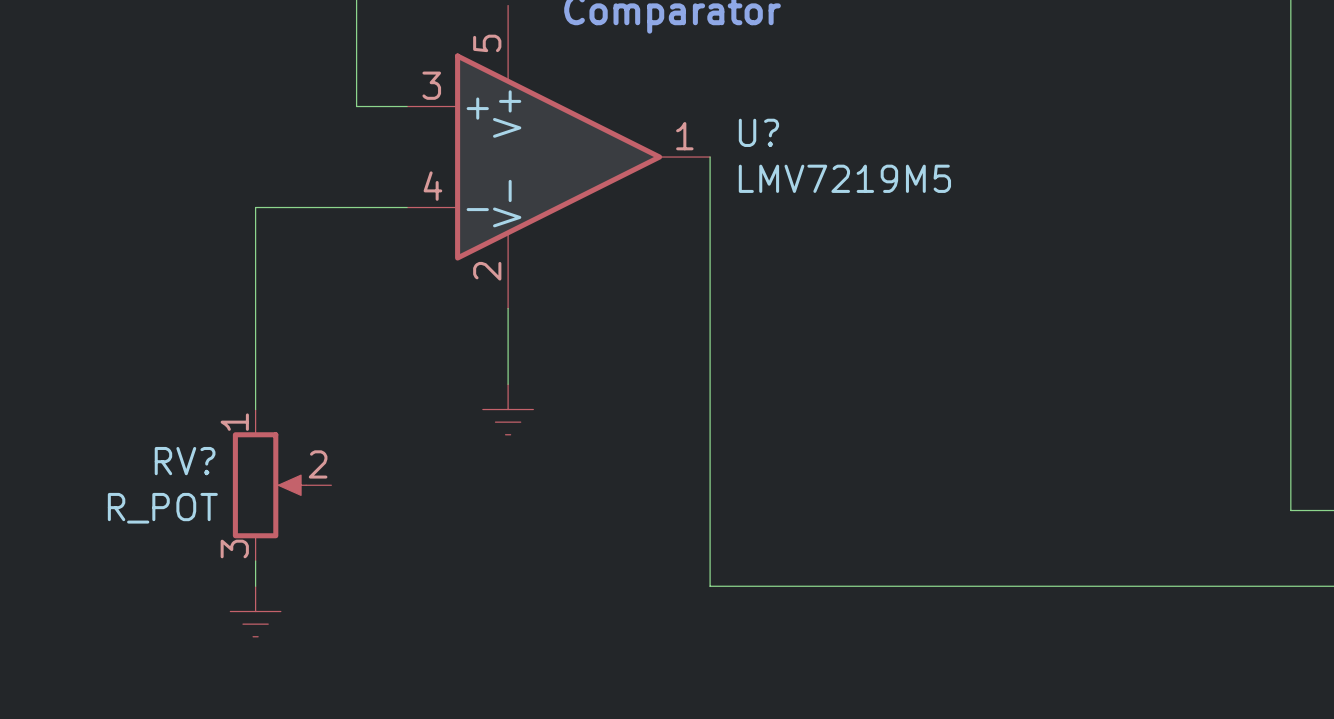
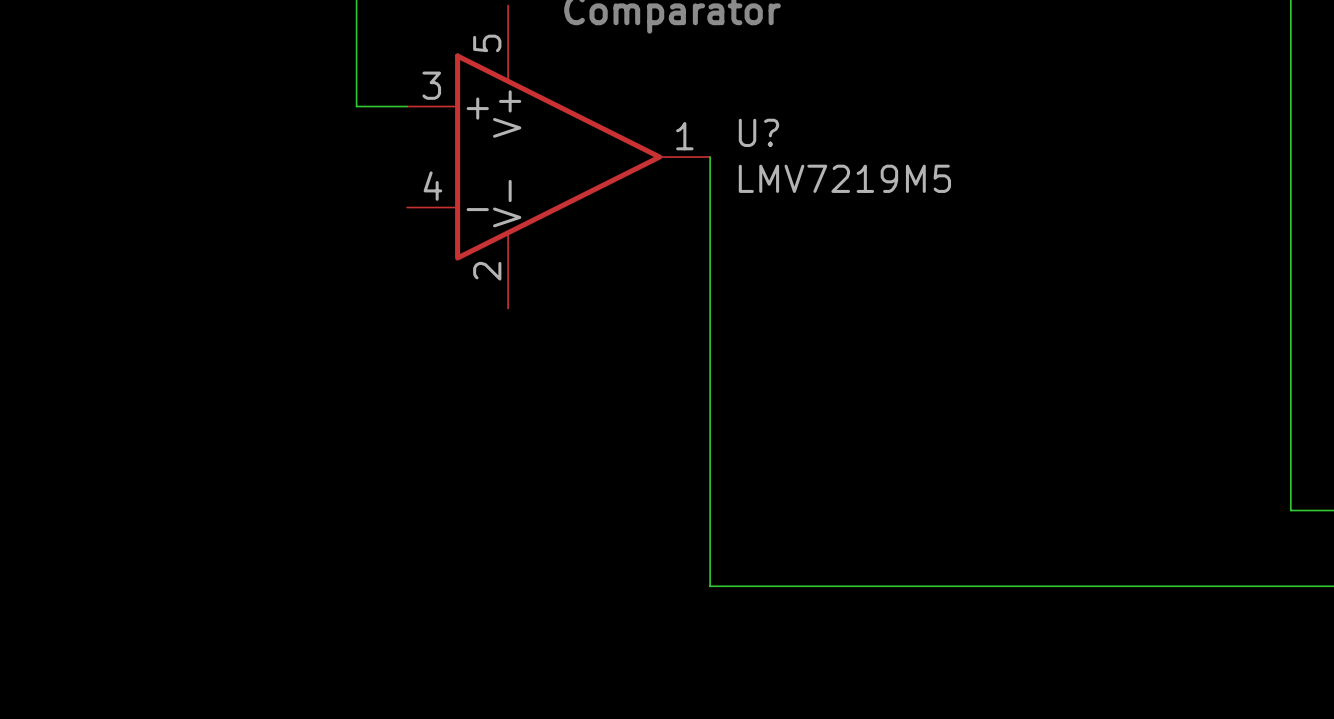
wire: (407, 207) (255, 207) (255, 409) -> none
wire: (508, 308) (508, 384) -> none
power symbol: (508, 409) -> none
RV?: R_POT (282, 485) -> none
wire: (255, 561) (255, 586) -> none
power symbol: (255, 611) -> none

